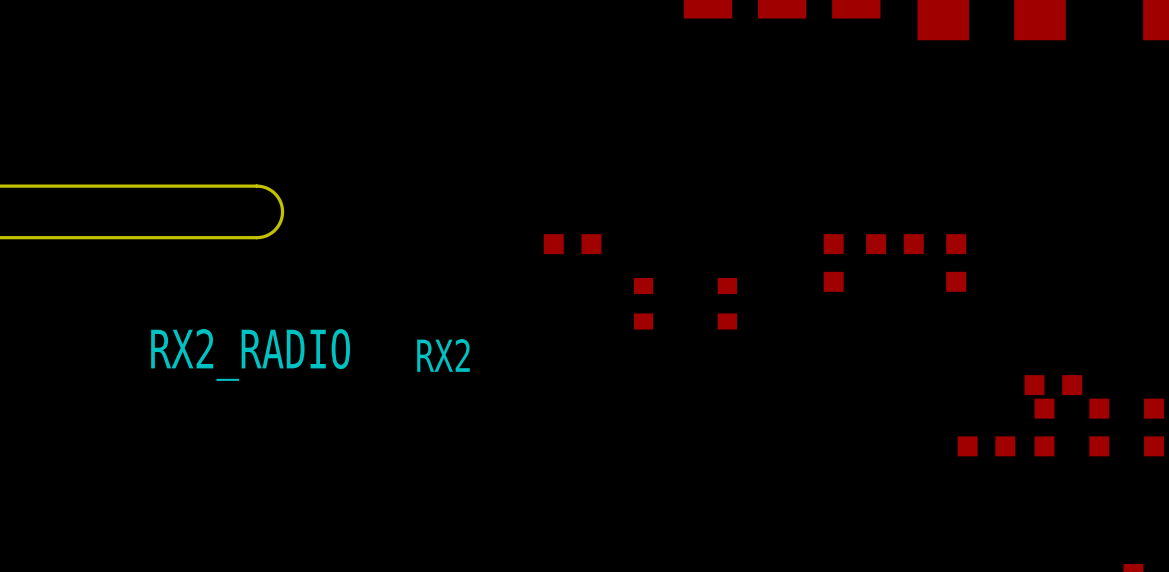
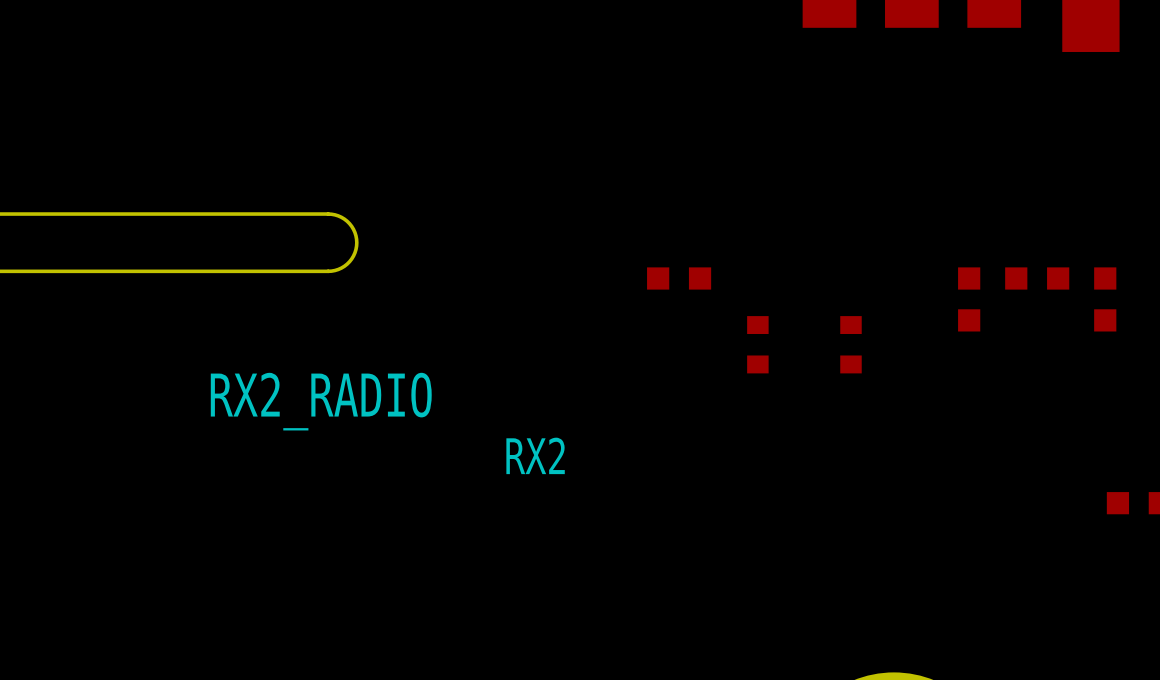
text position: RX2 (443, 355) -> RX2 (535, 455)

